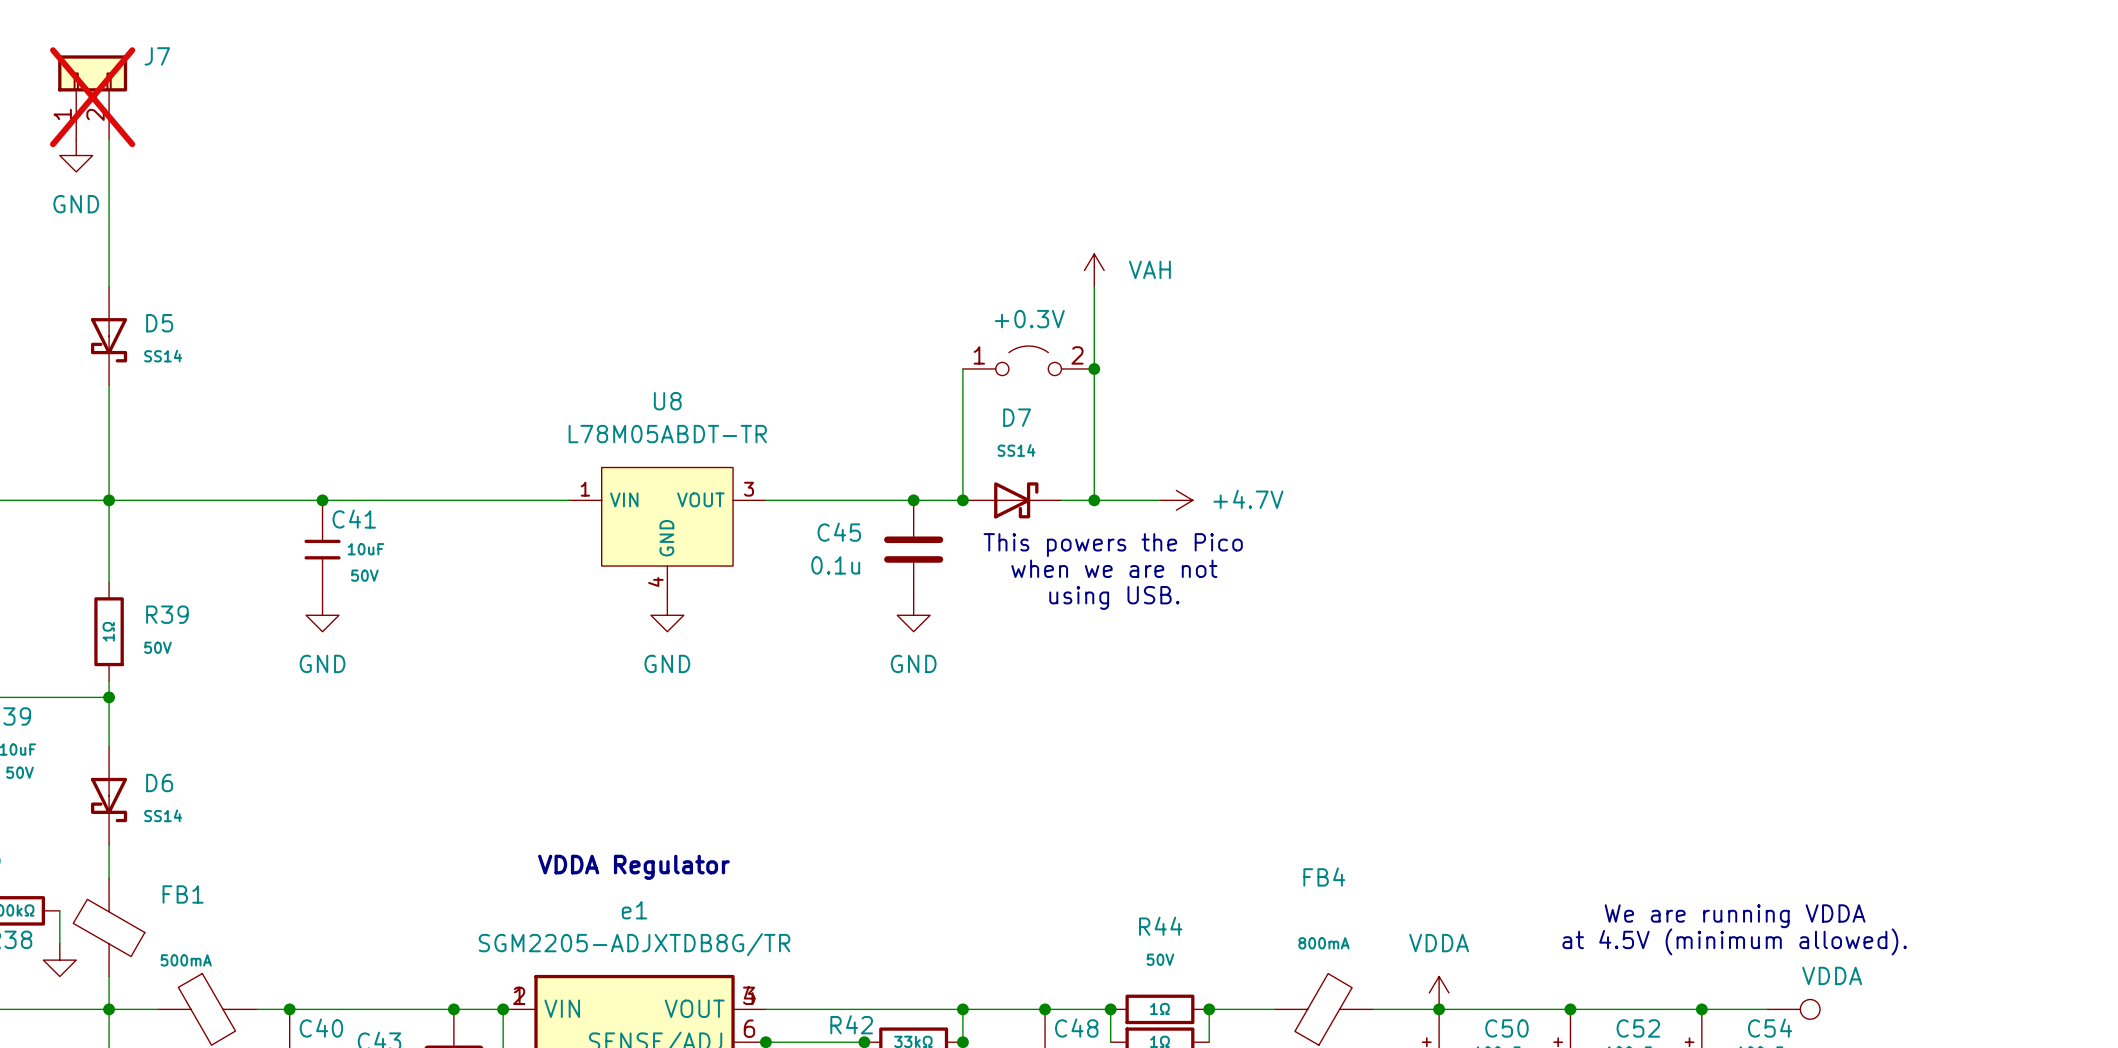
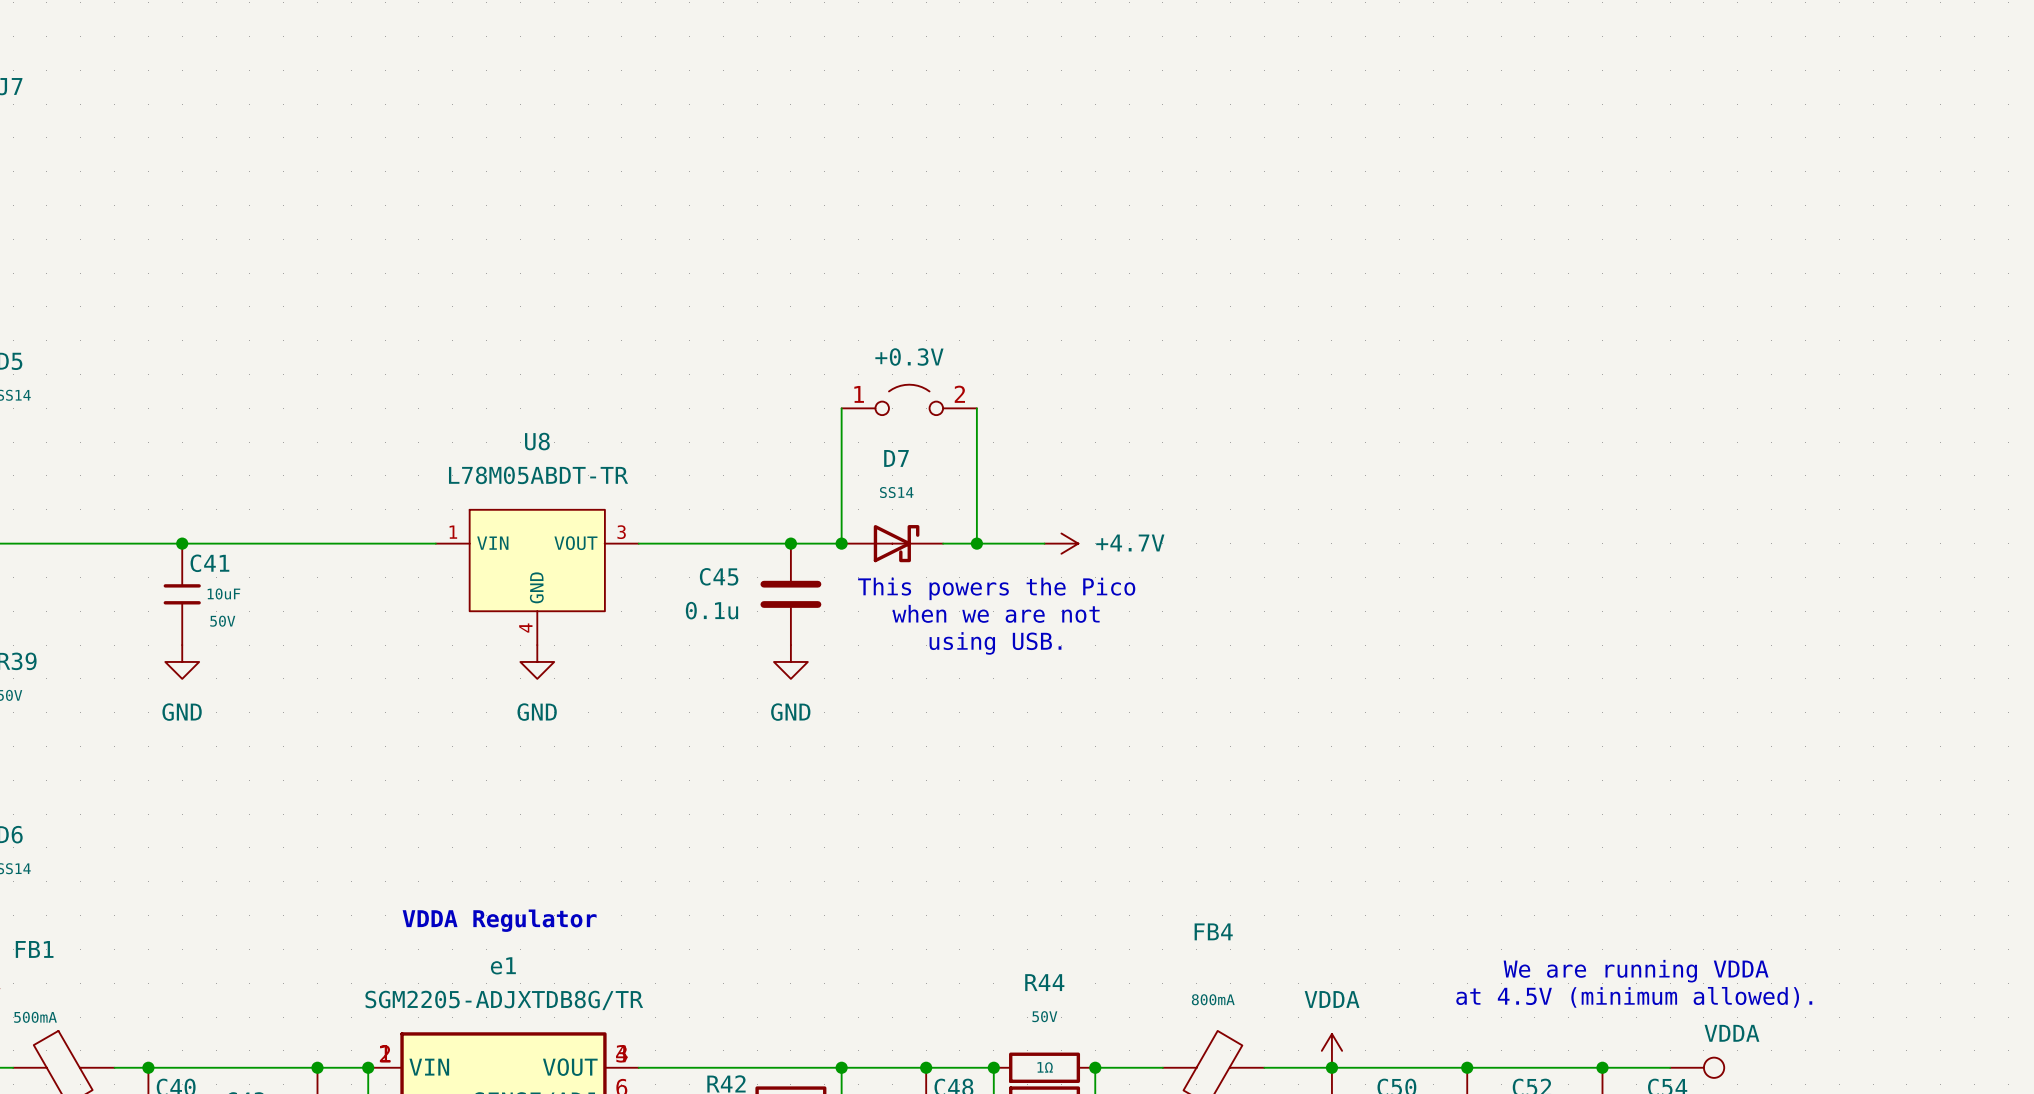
power symbol: VAH (1094, 270) -> none
wire: (1094, 286) (1094, 368) -> none
junction: (1094, 368) -> none

